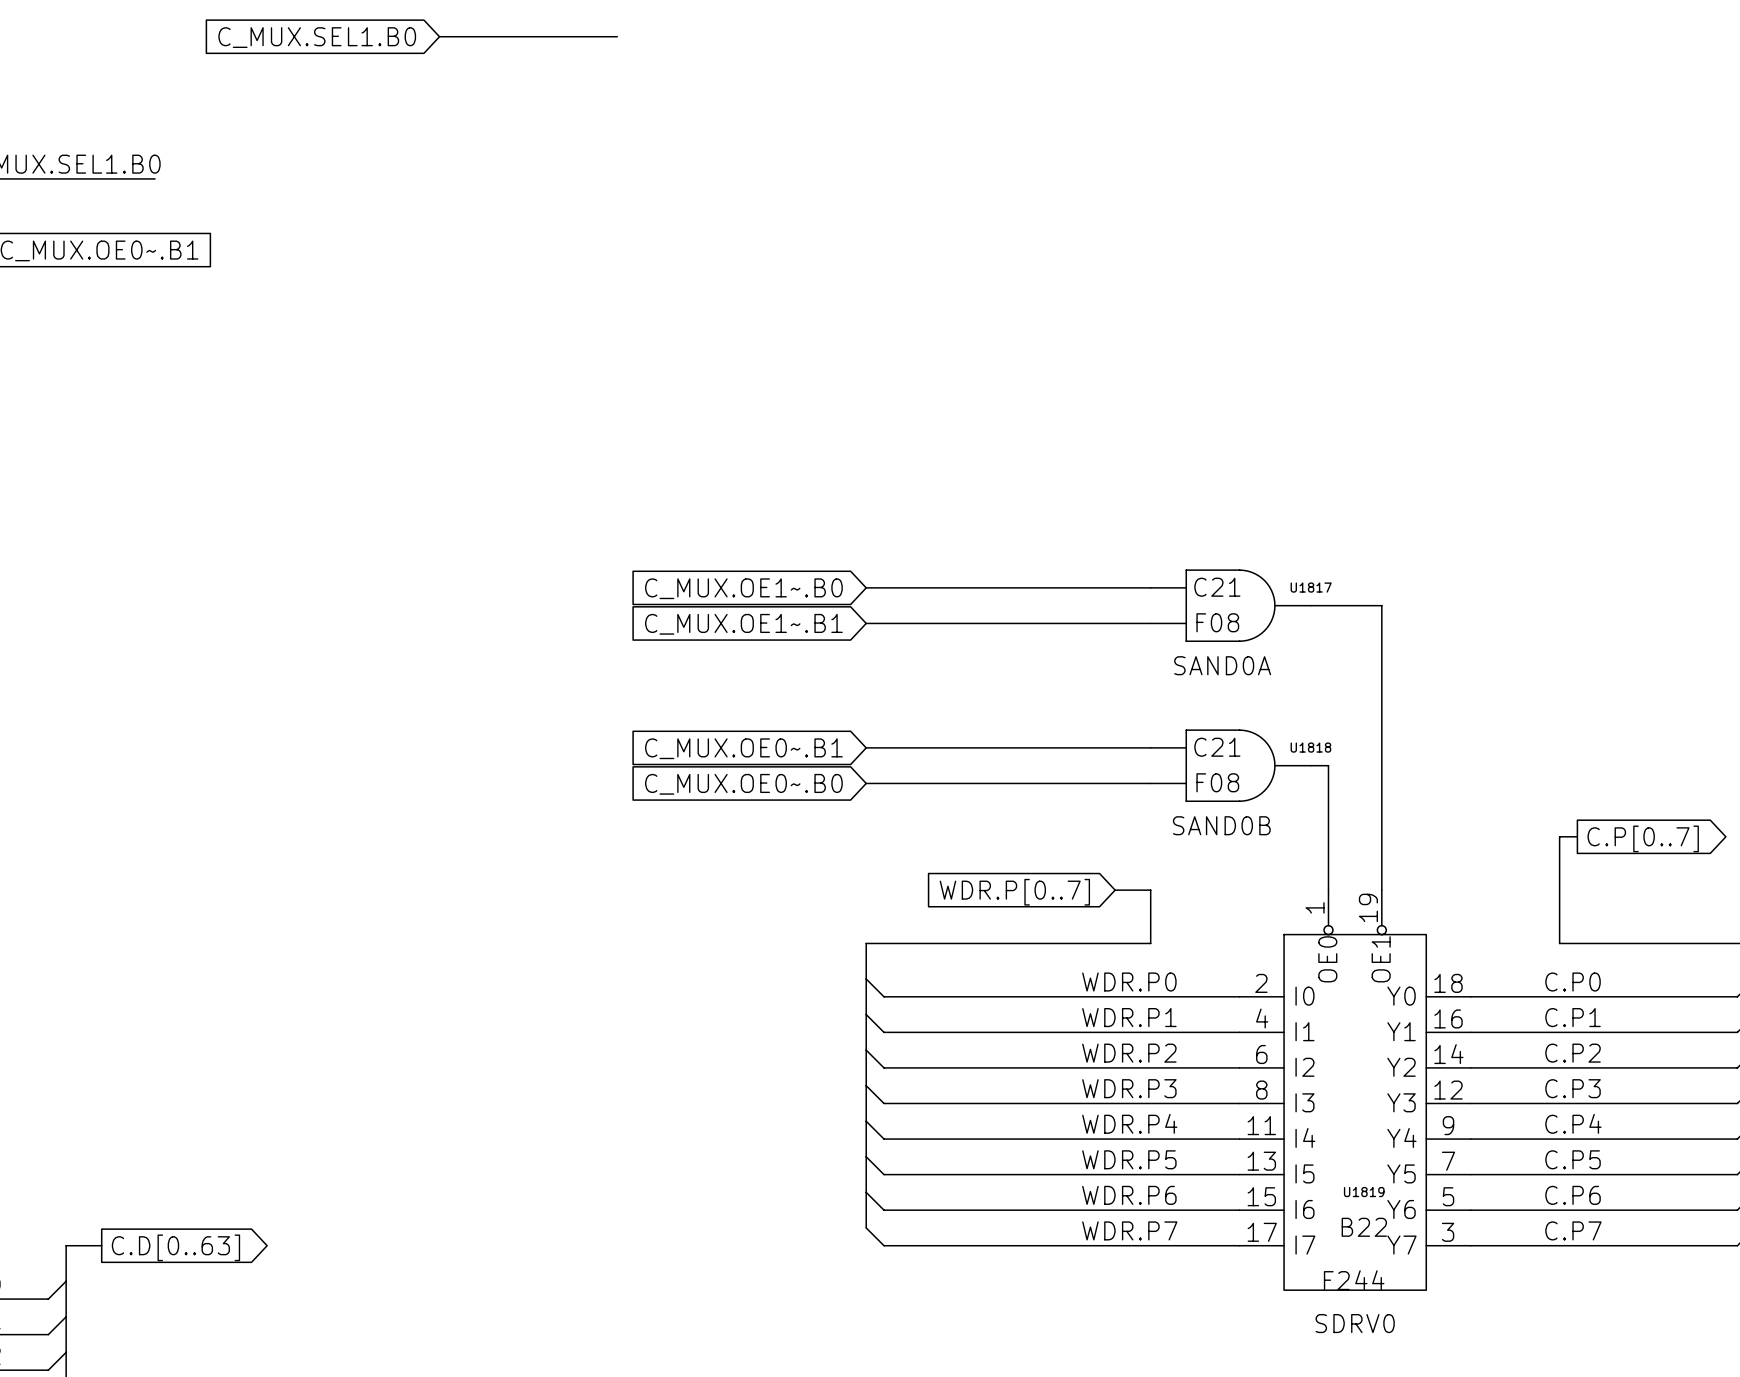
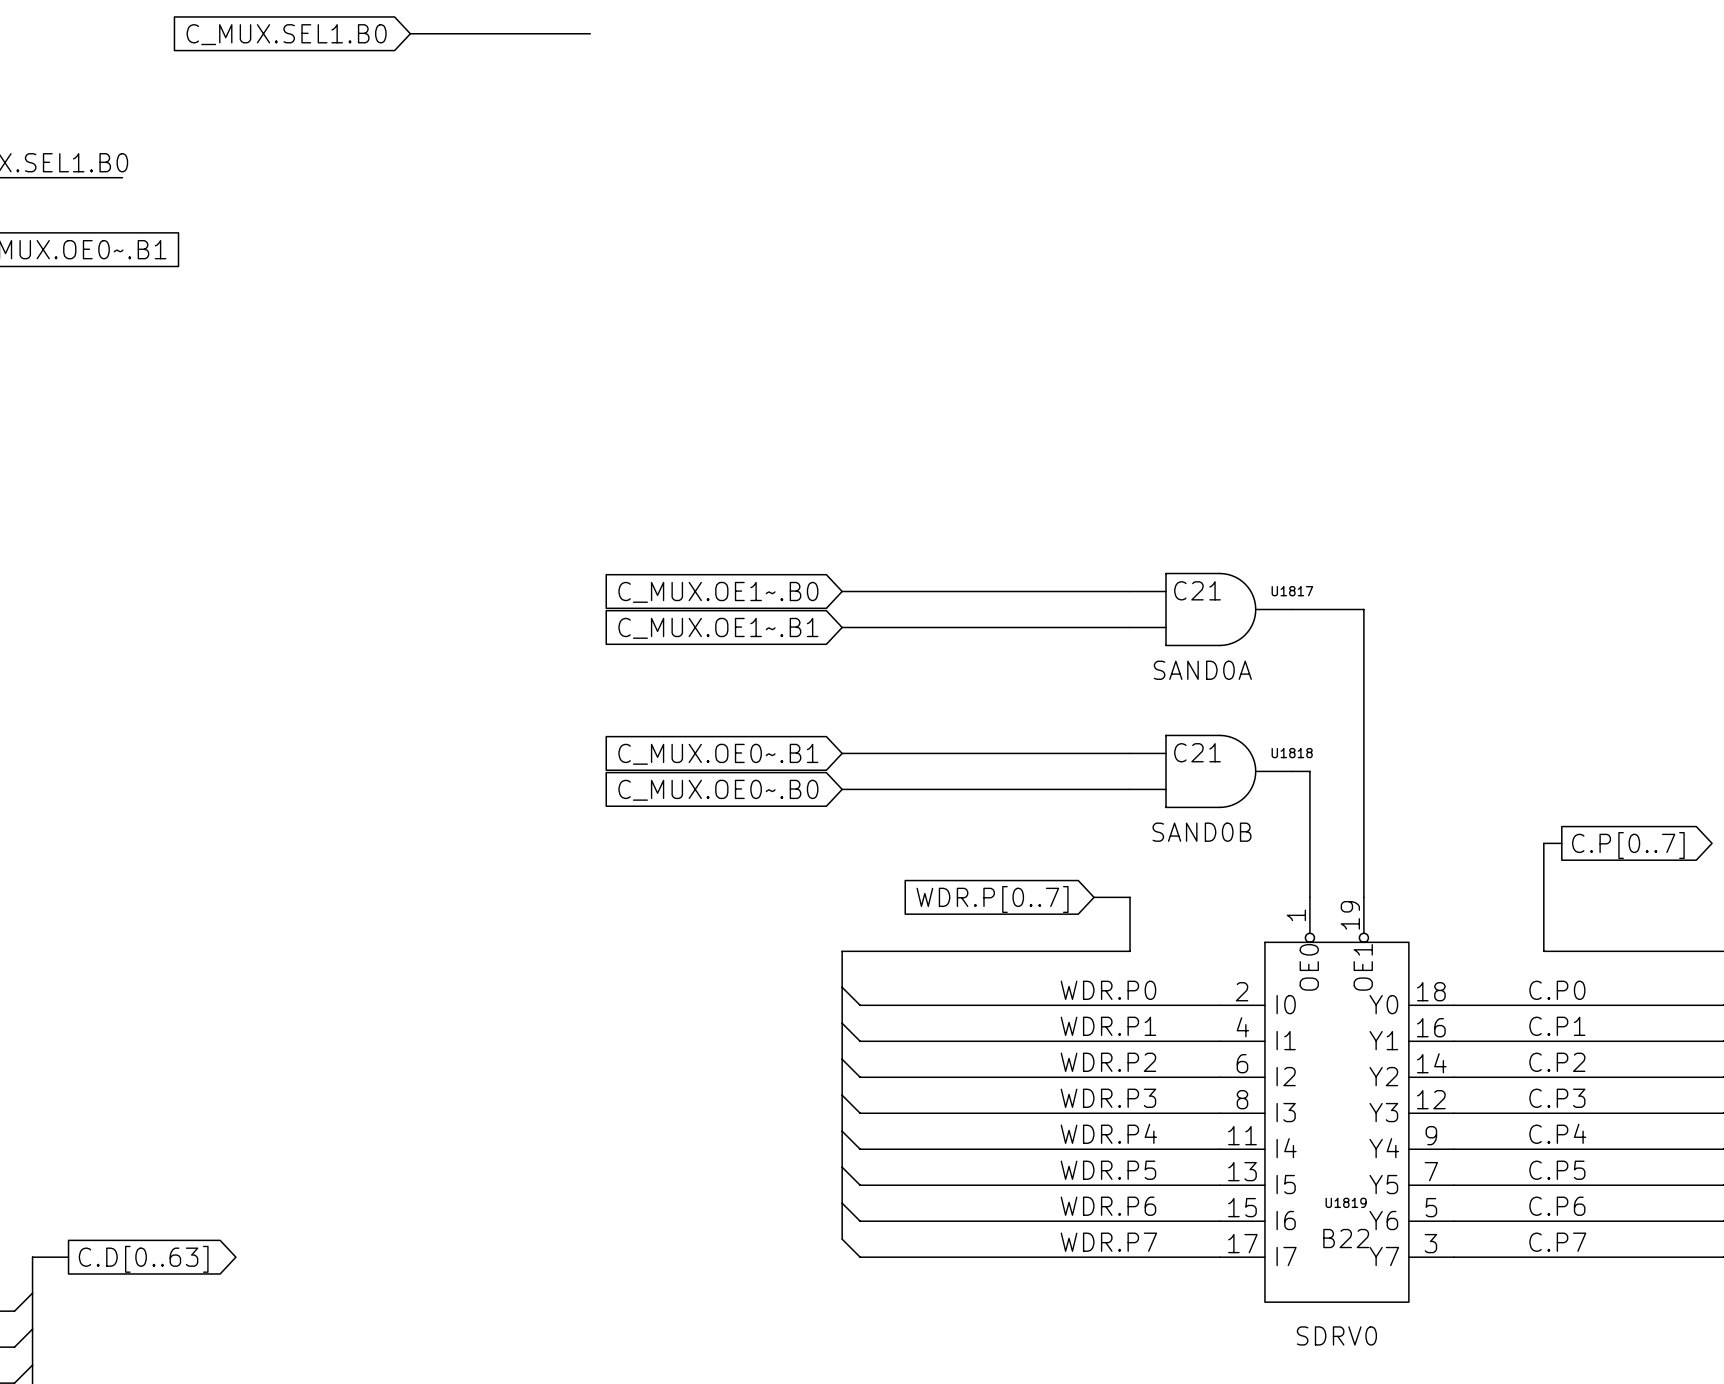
U1817 value: F08 (1217, 622) -> none
U1818 value: F08 (1217, 782) -> none
U1819 value: F244 (1354, 1280) -> none

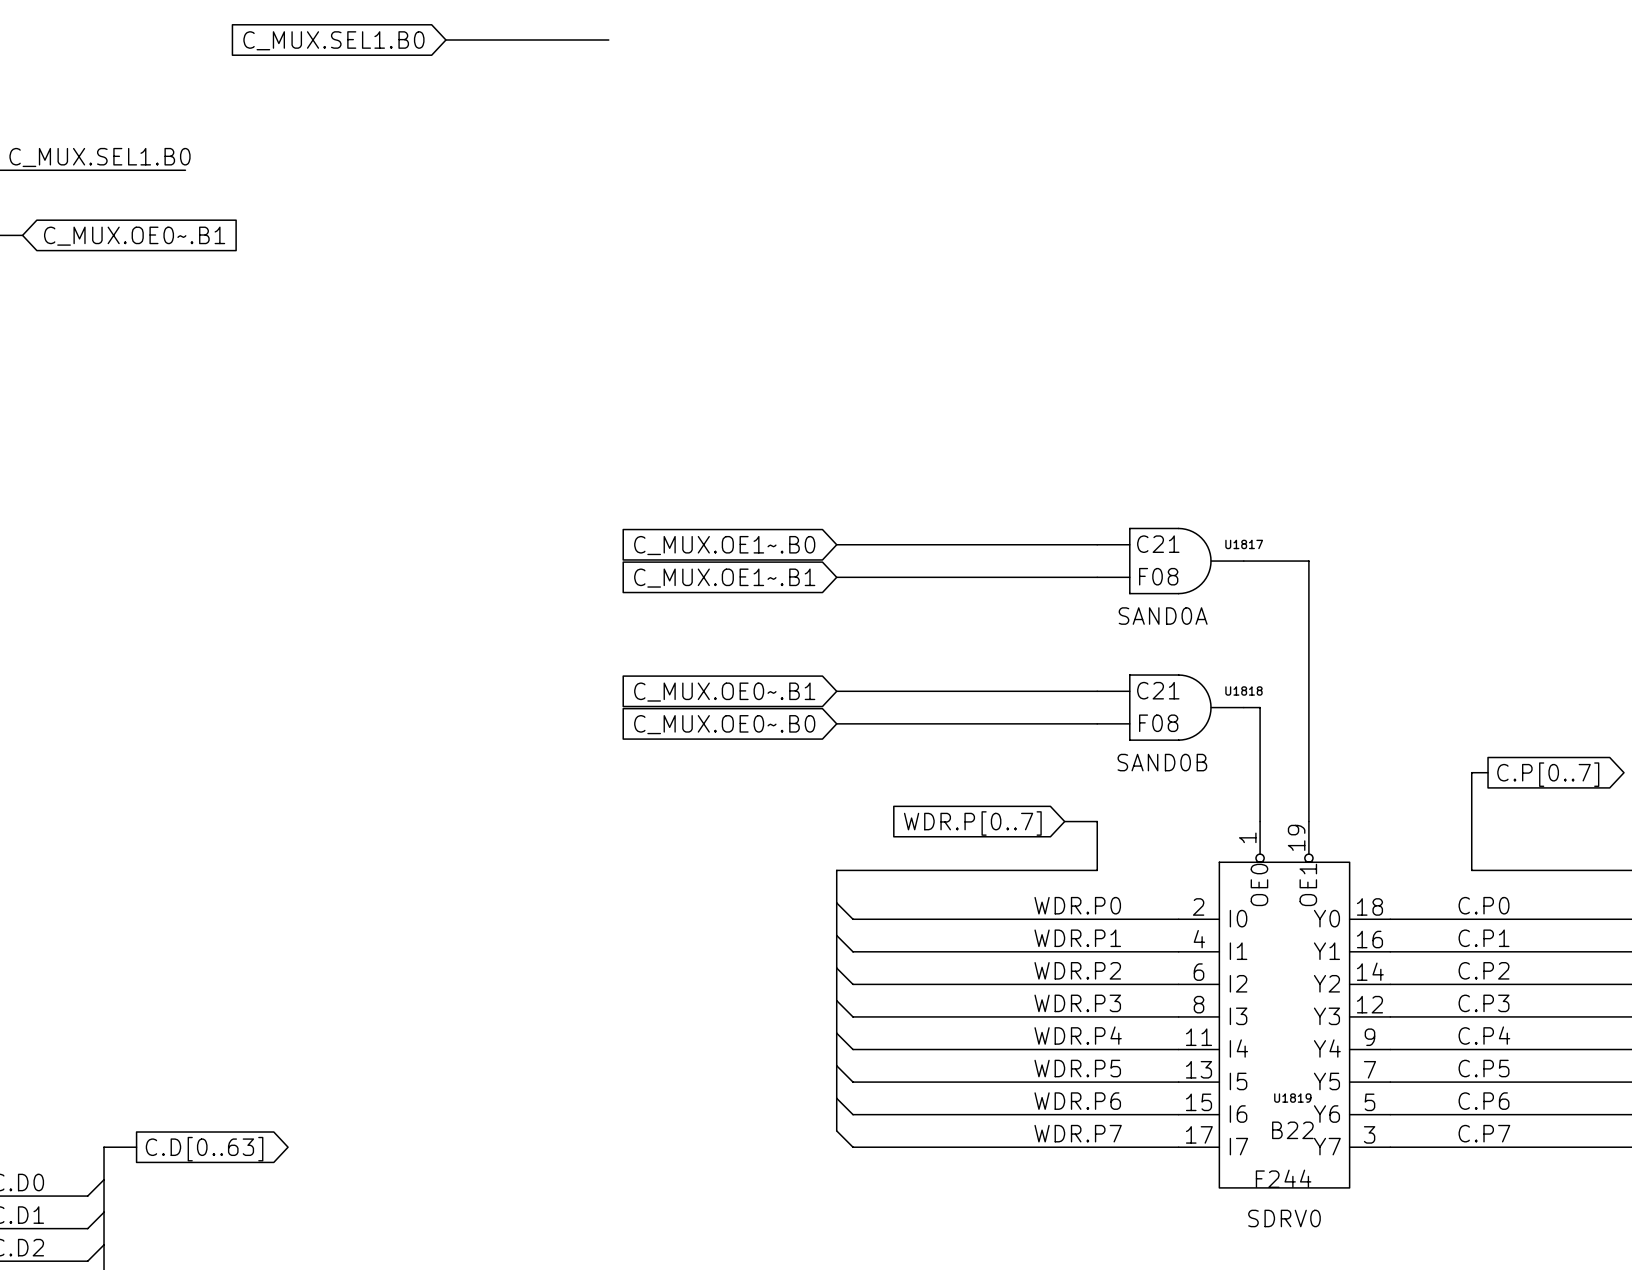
U1817 value: none -> F08 (1158, 576)
U1818 value: none -> F08 (1158, 723)
U1819 value: none -> F244 (1283, 1178)

